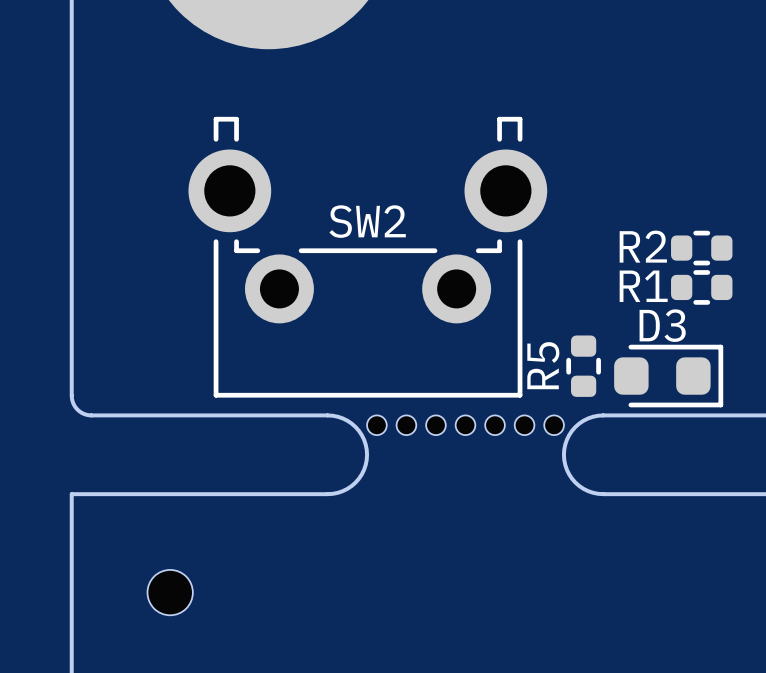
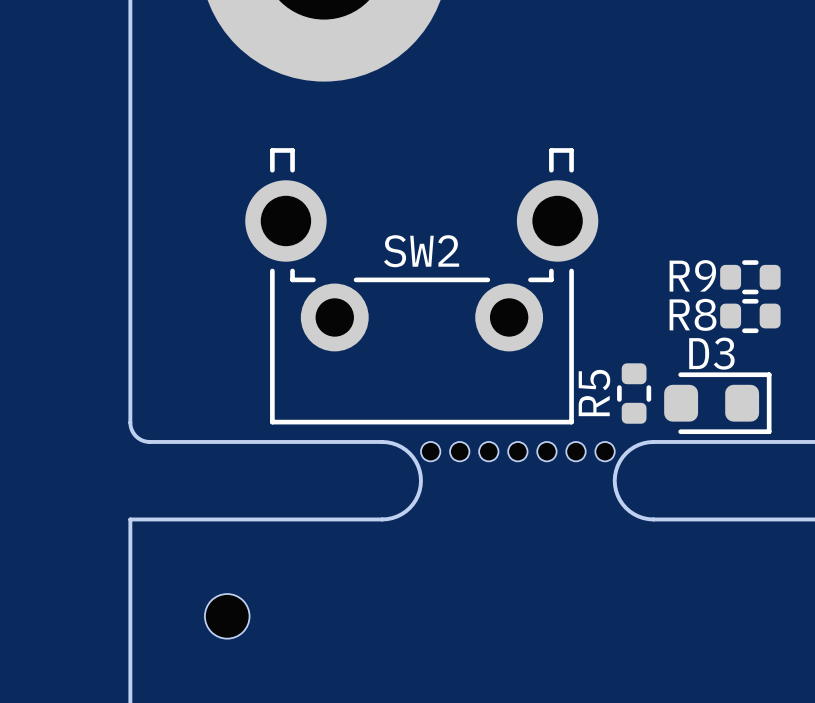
R2 name: R2 (643, 246) -> R9 (692, 275)
R1 name: R1 (643, 286) -> R8 (693, 314)

